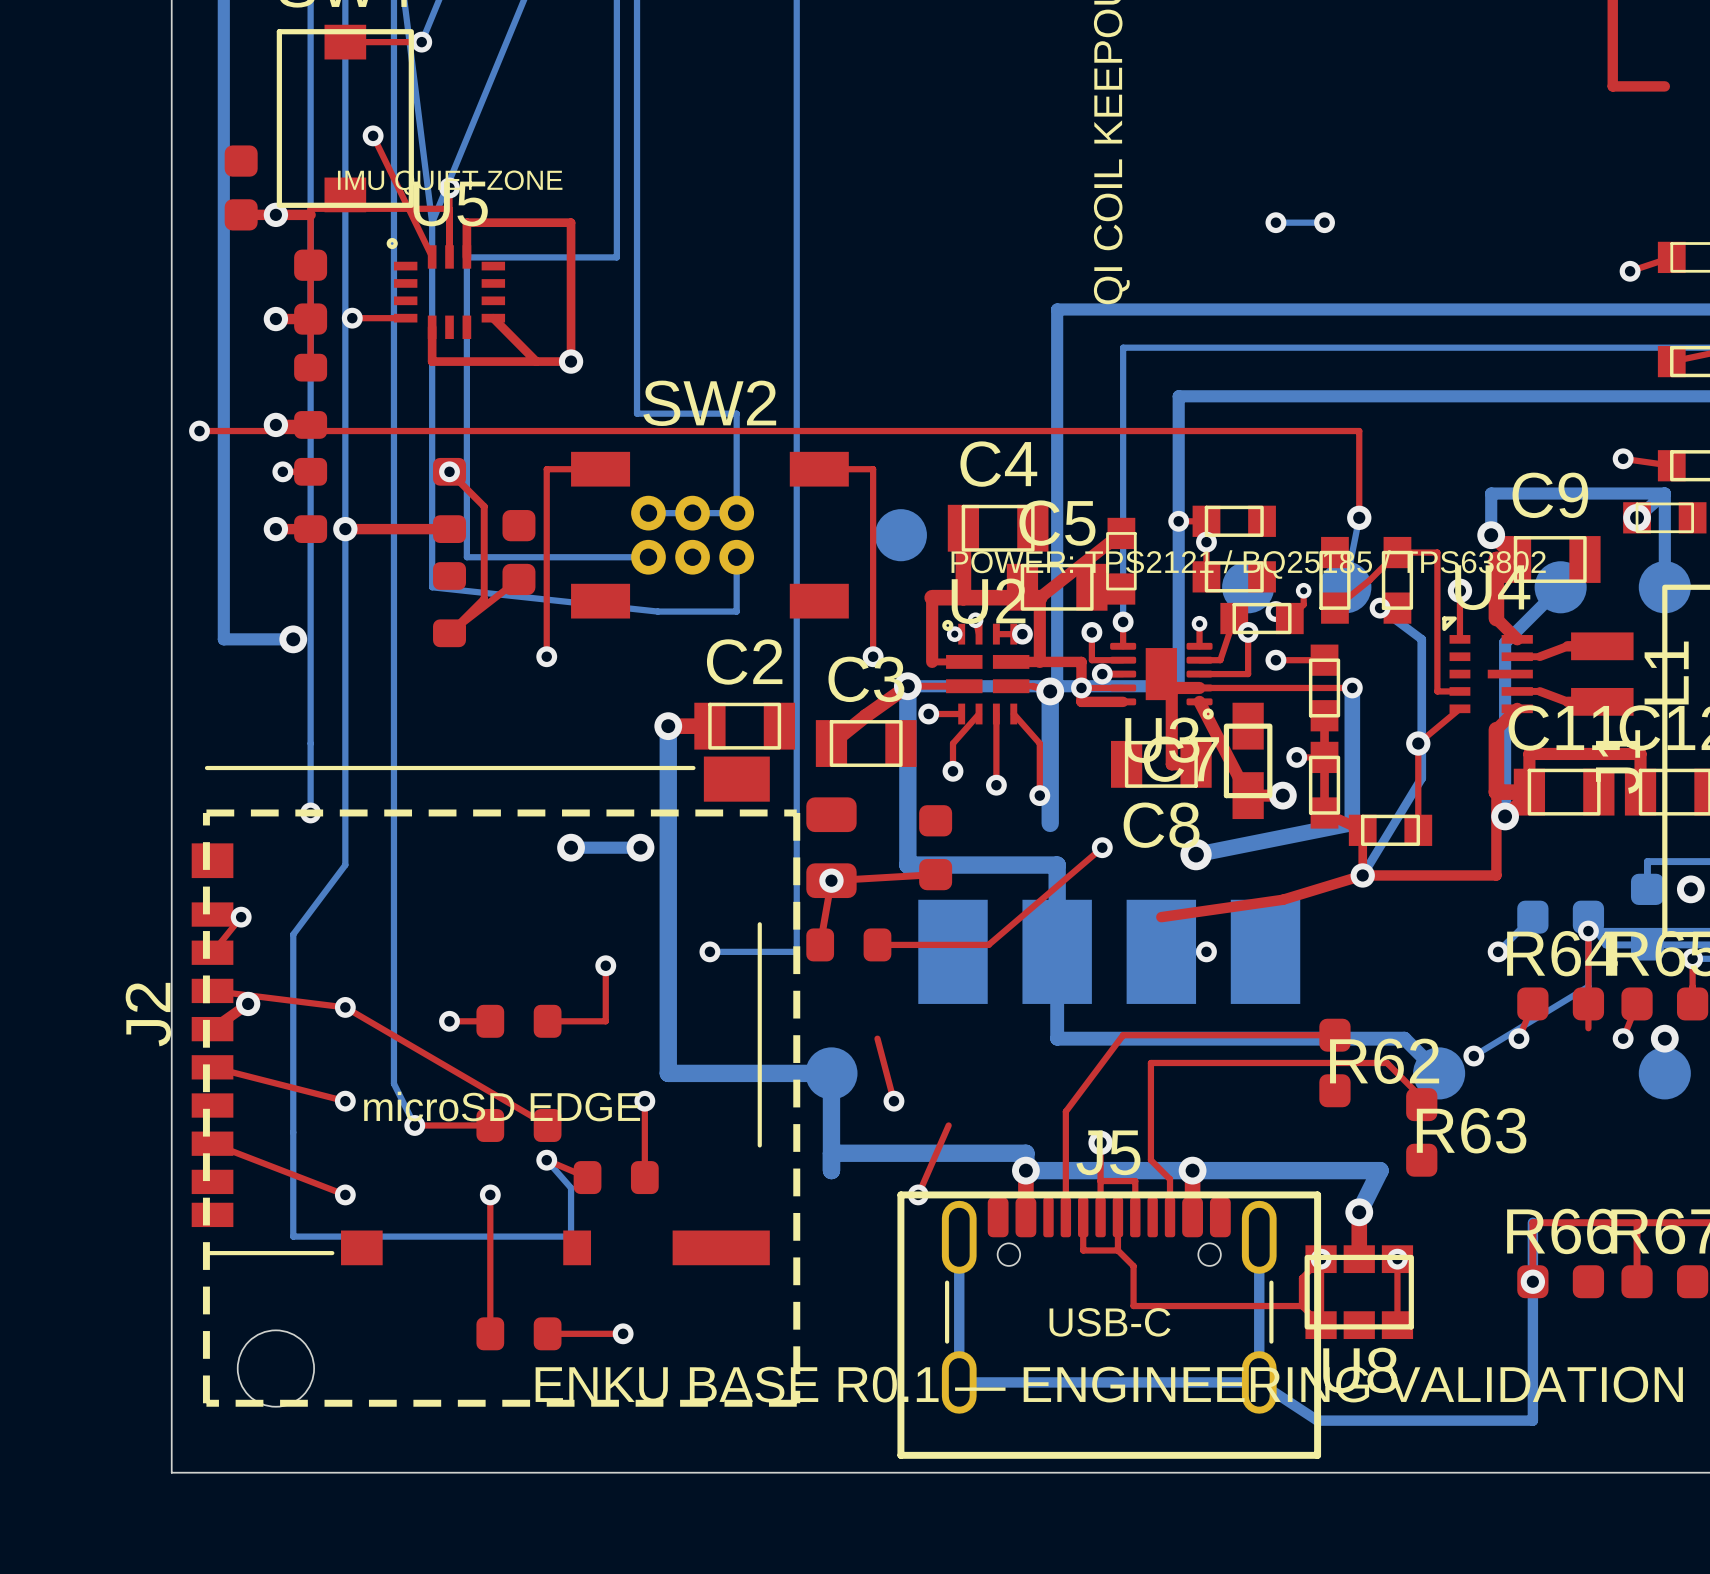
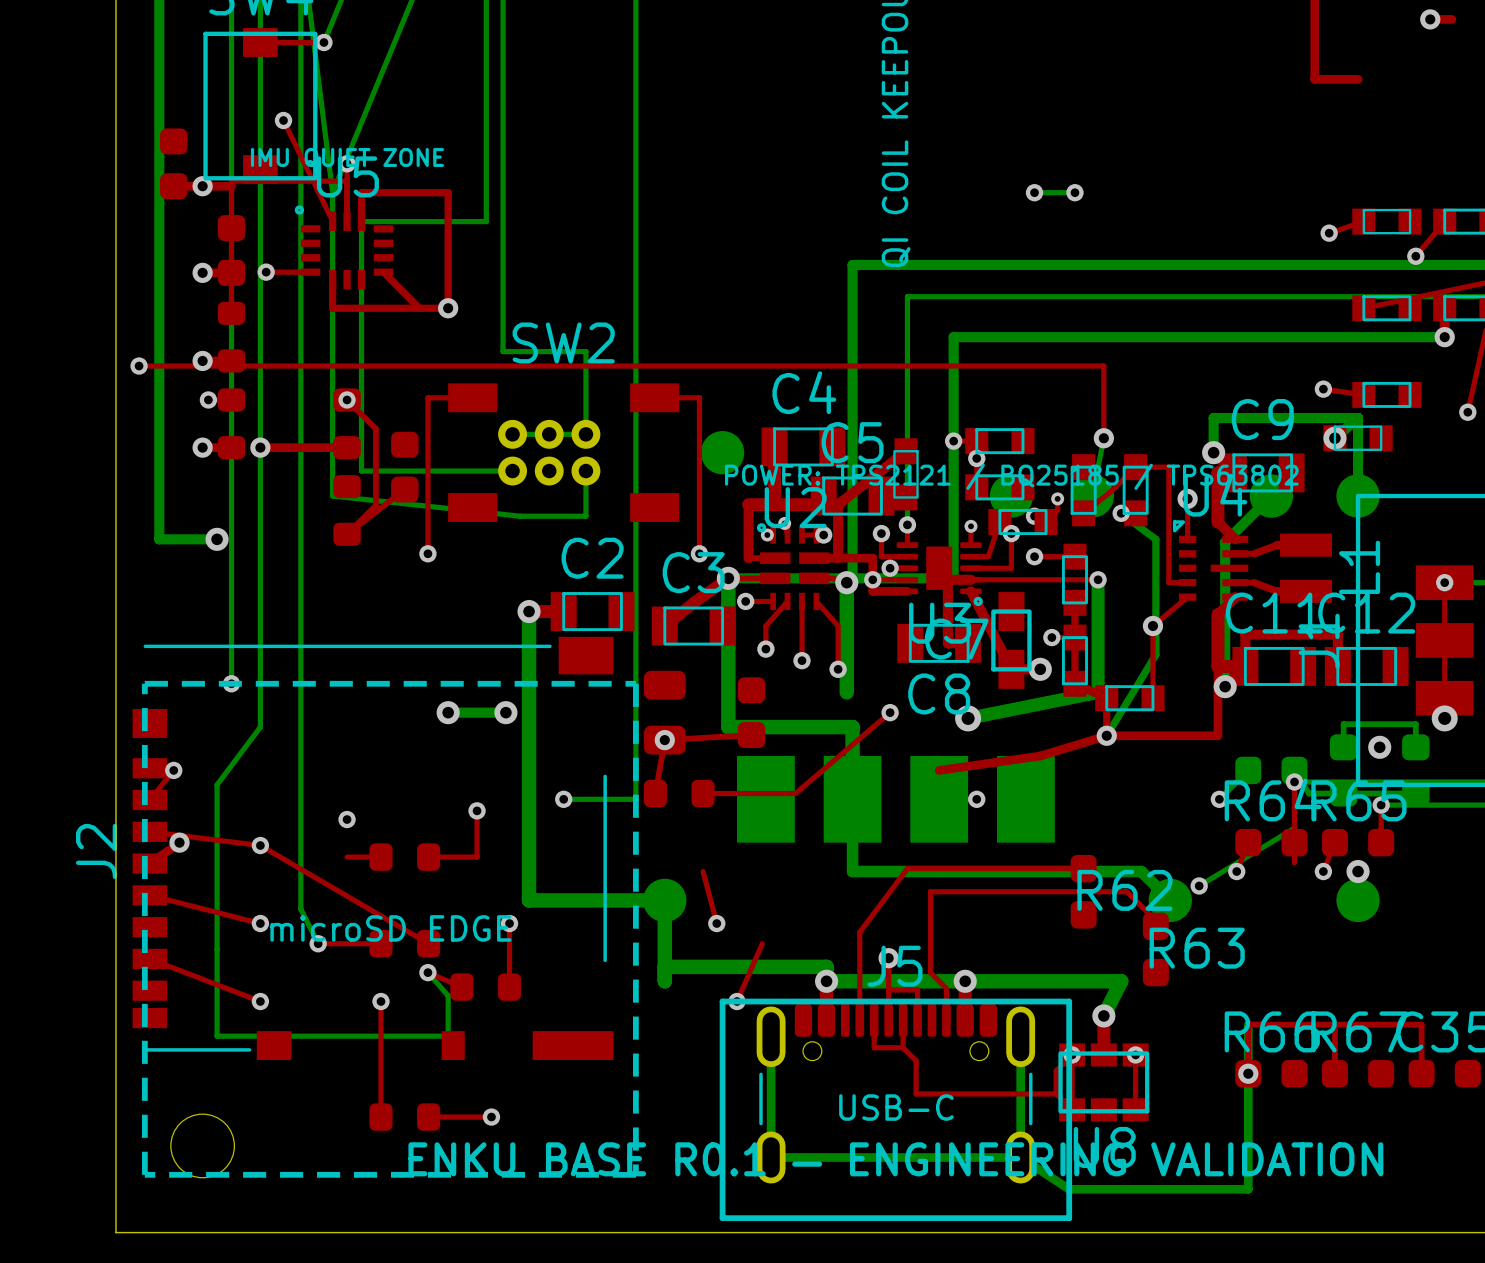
via position: (449, 1021) -> (347, 819)

